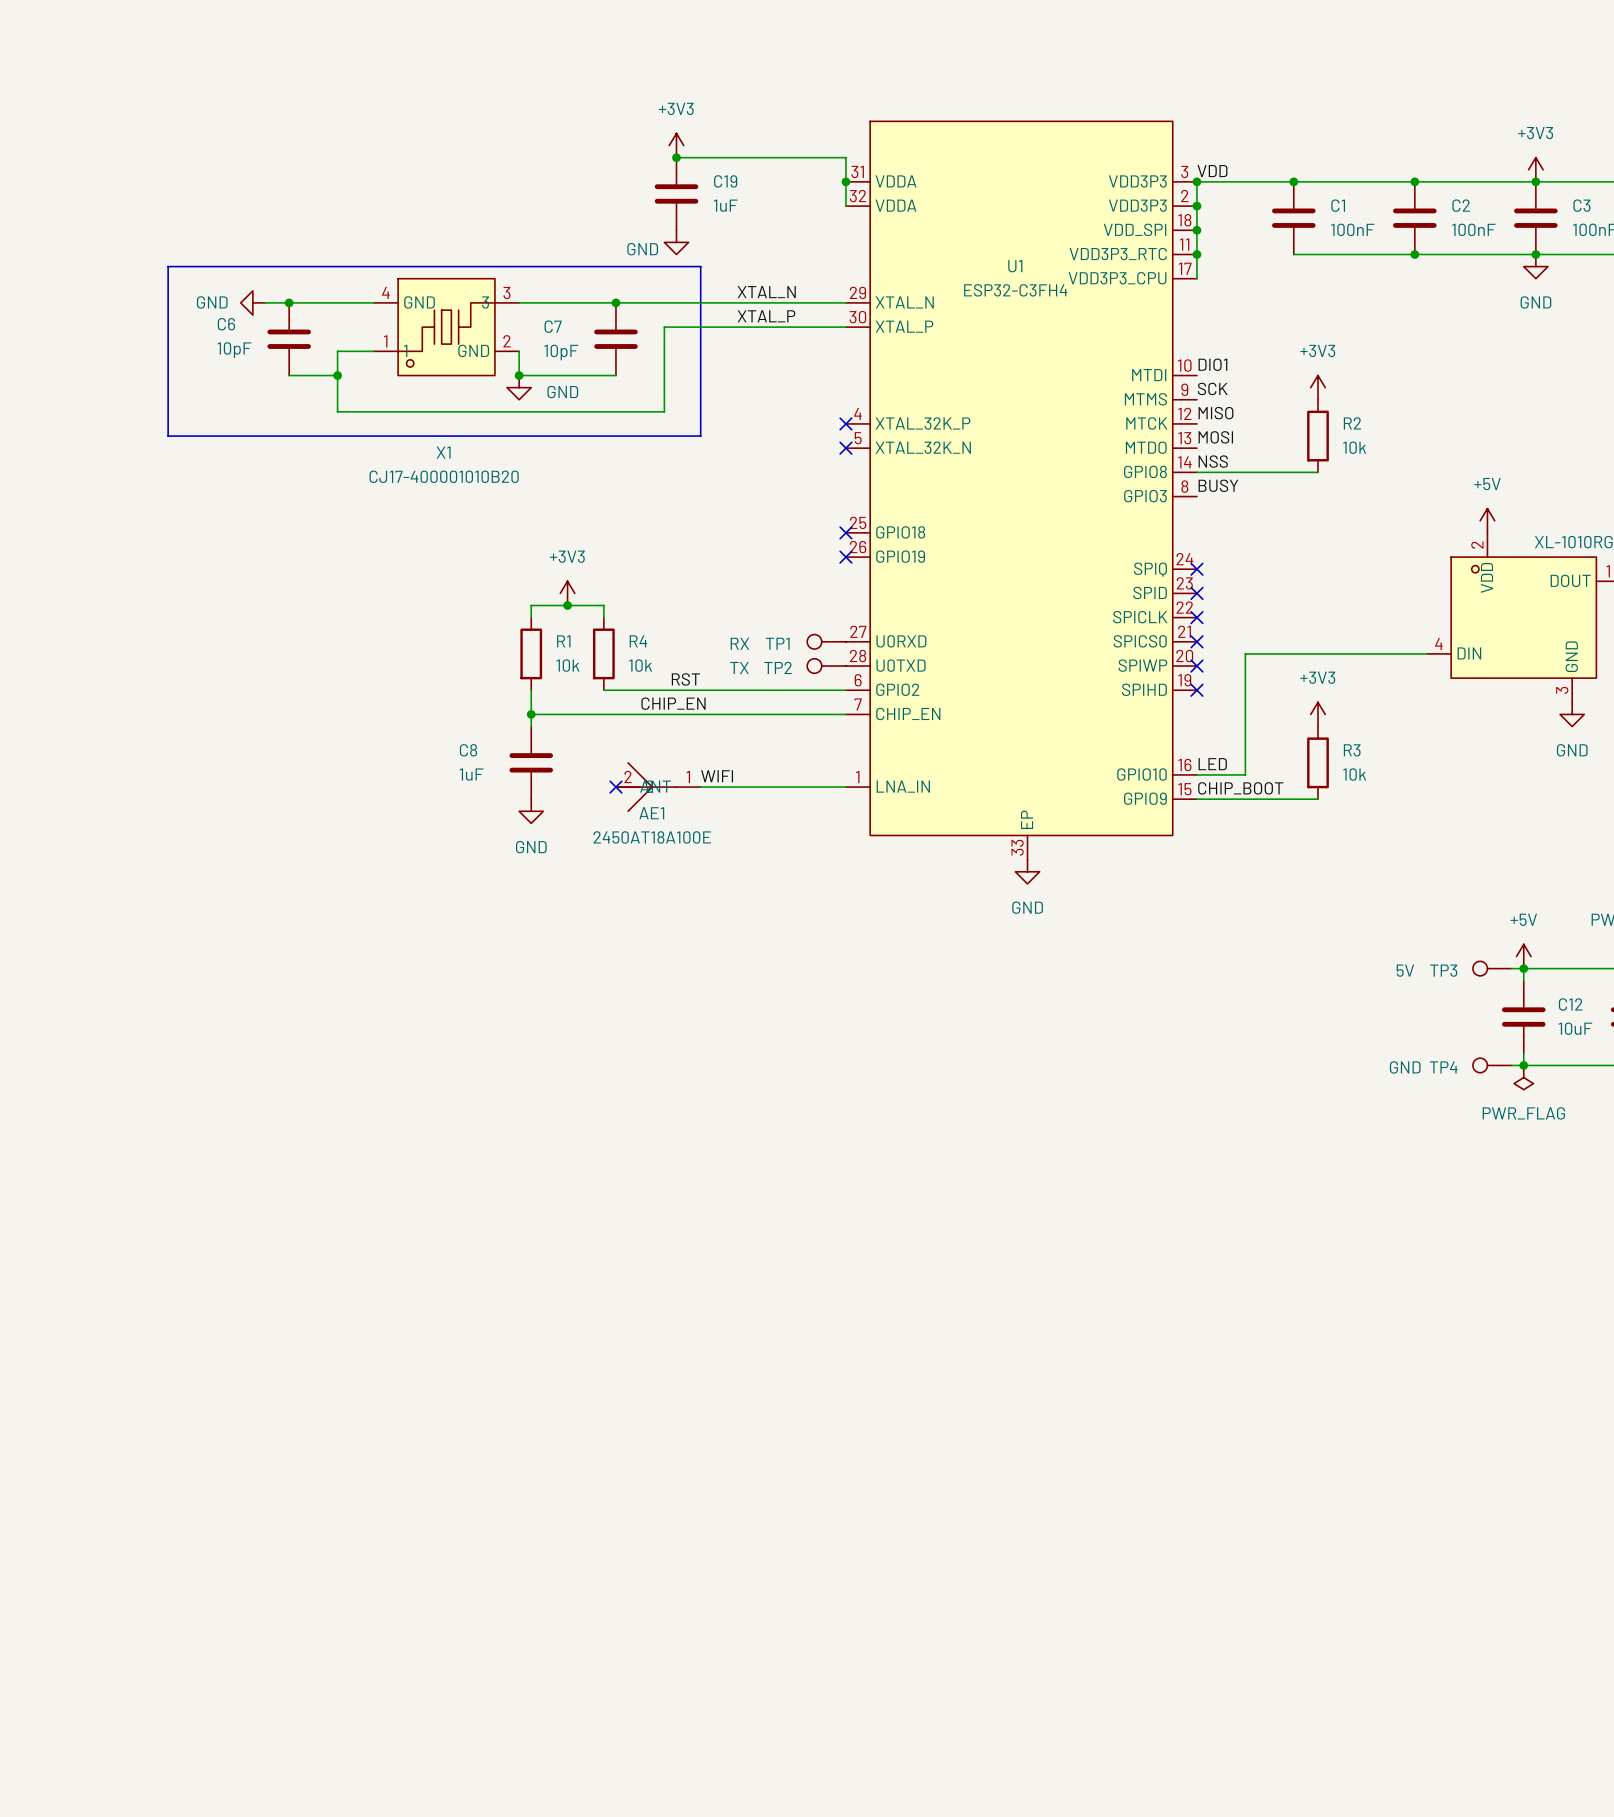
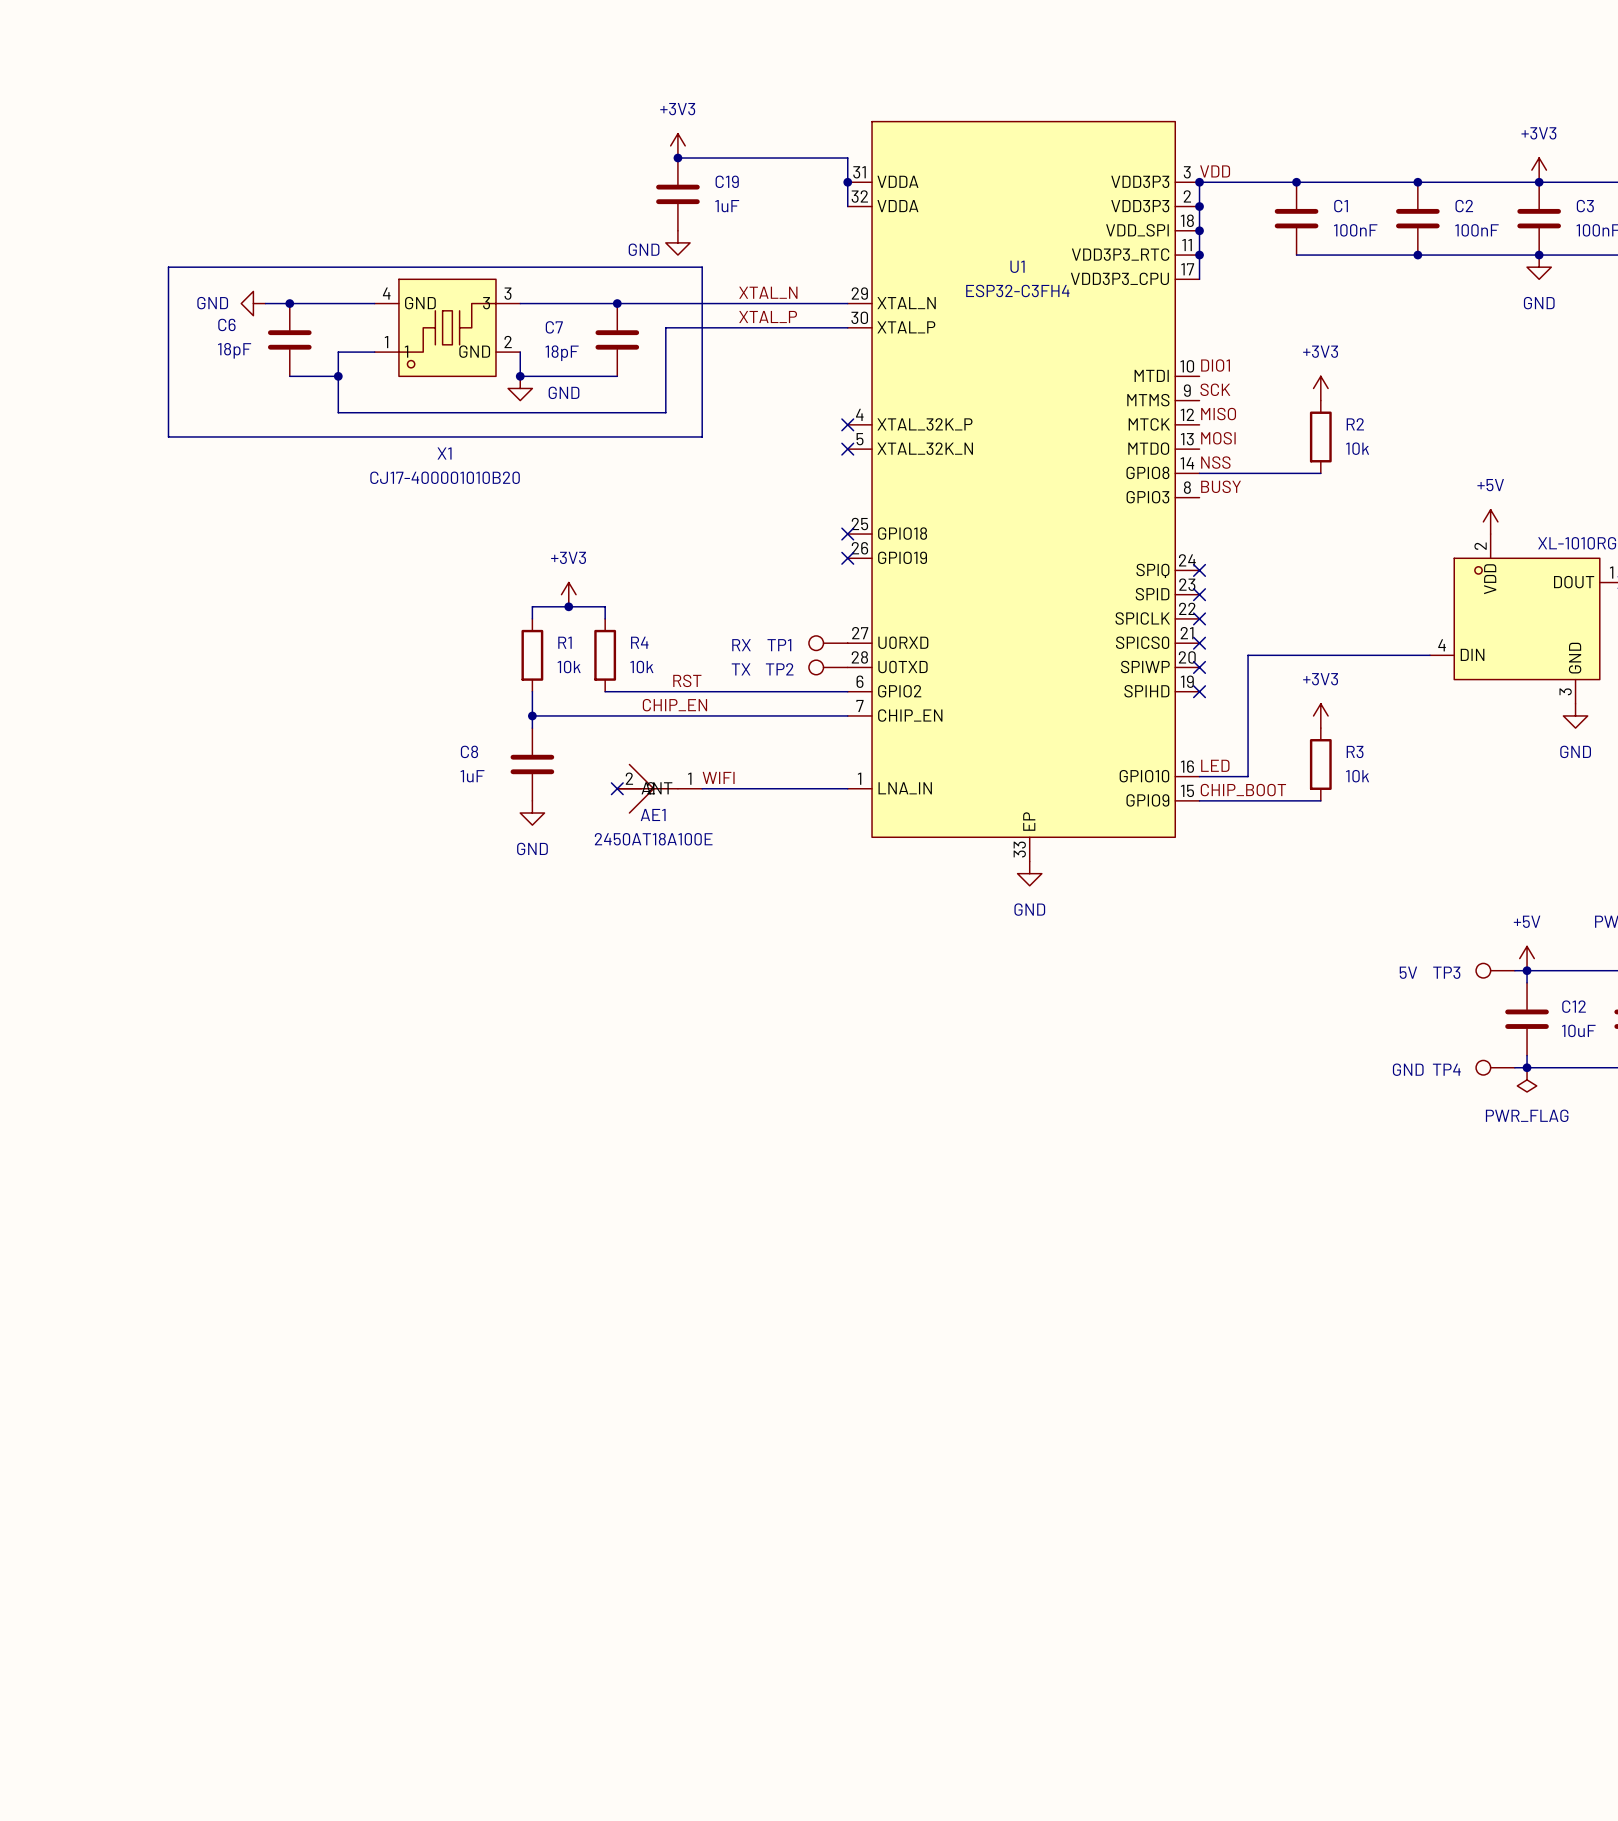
C6 value: 10pF (234, 350) -> 18pF (234, 350)
C7 value: 10pF (561, 352) -> 18pF (562, 353)

